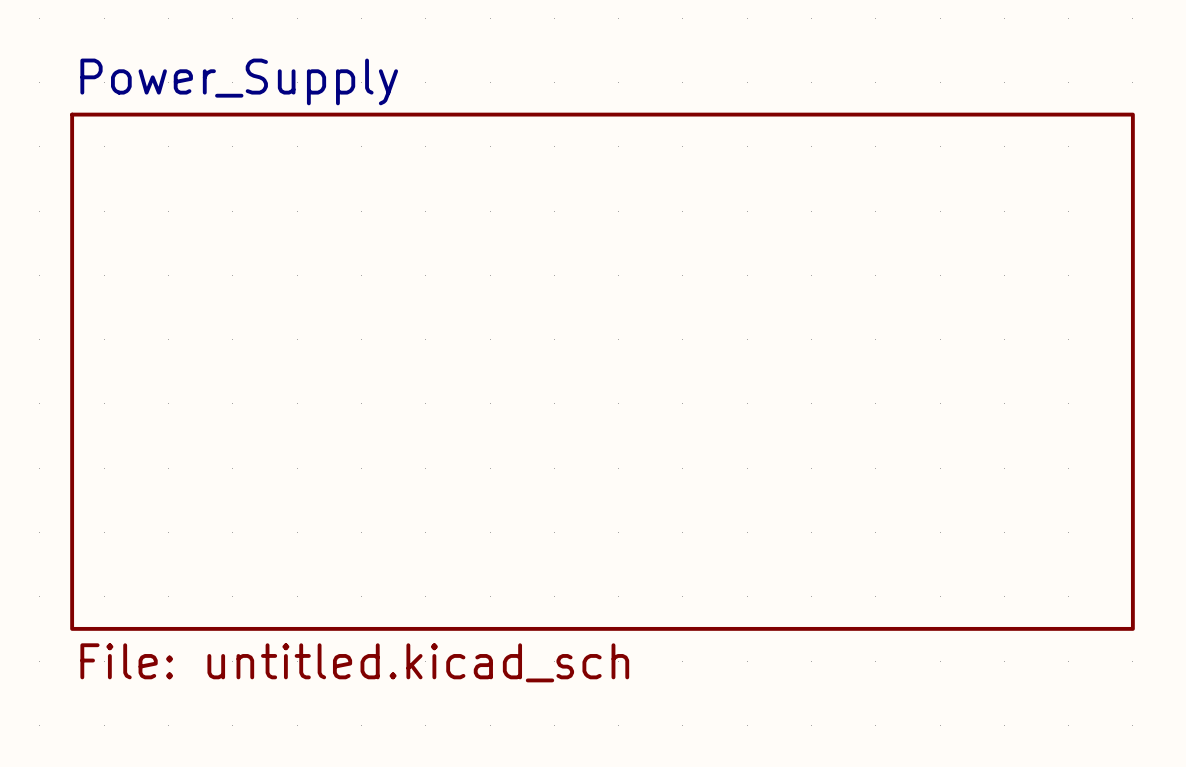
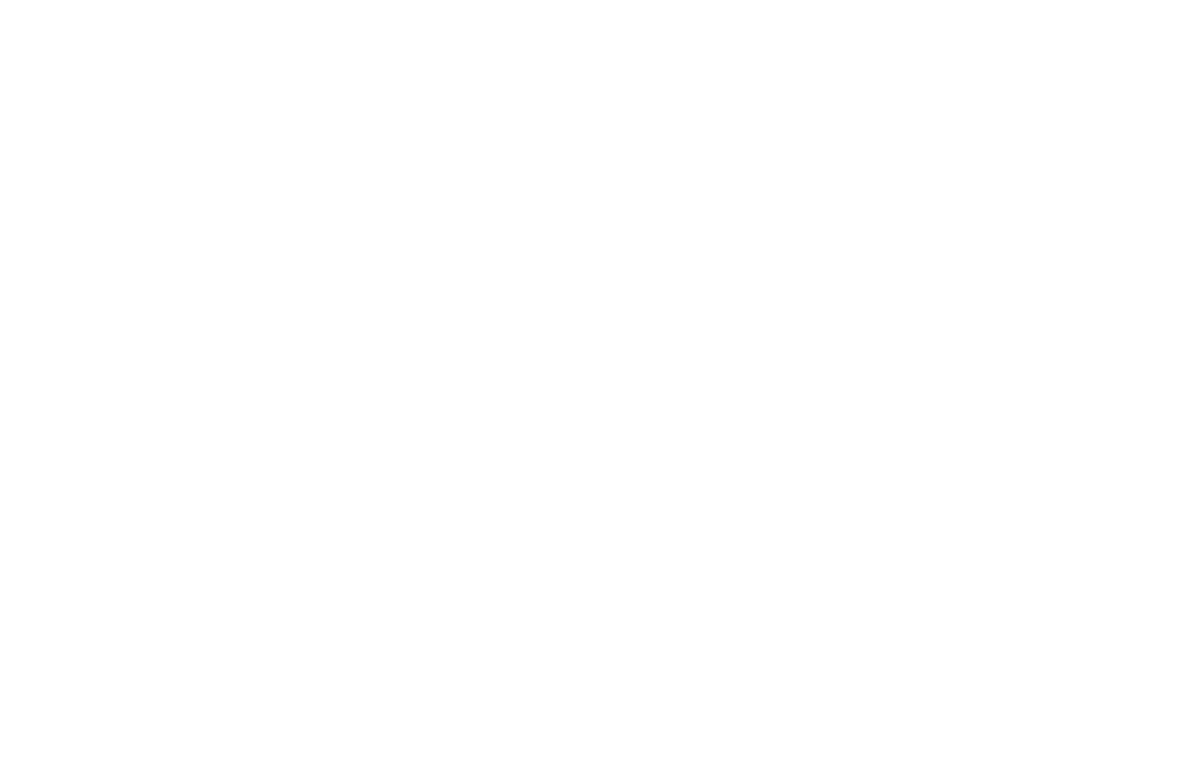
sheet Power_Supply: File: untitled.kicad_sch (602, 371) -> none

